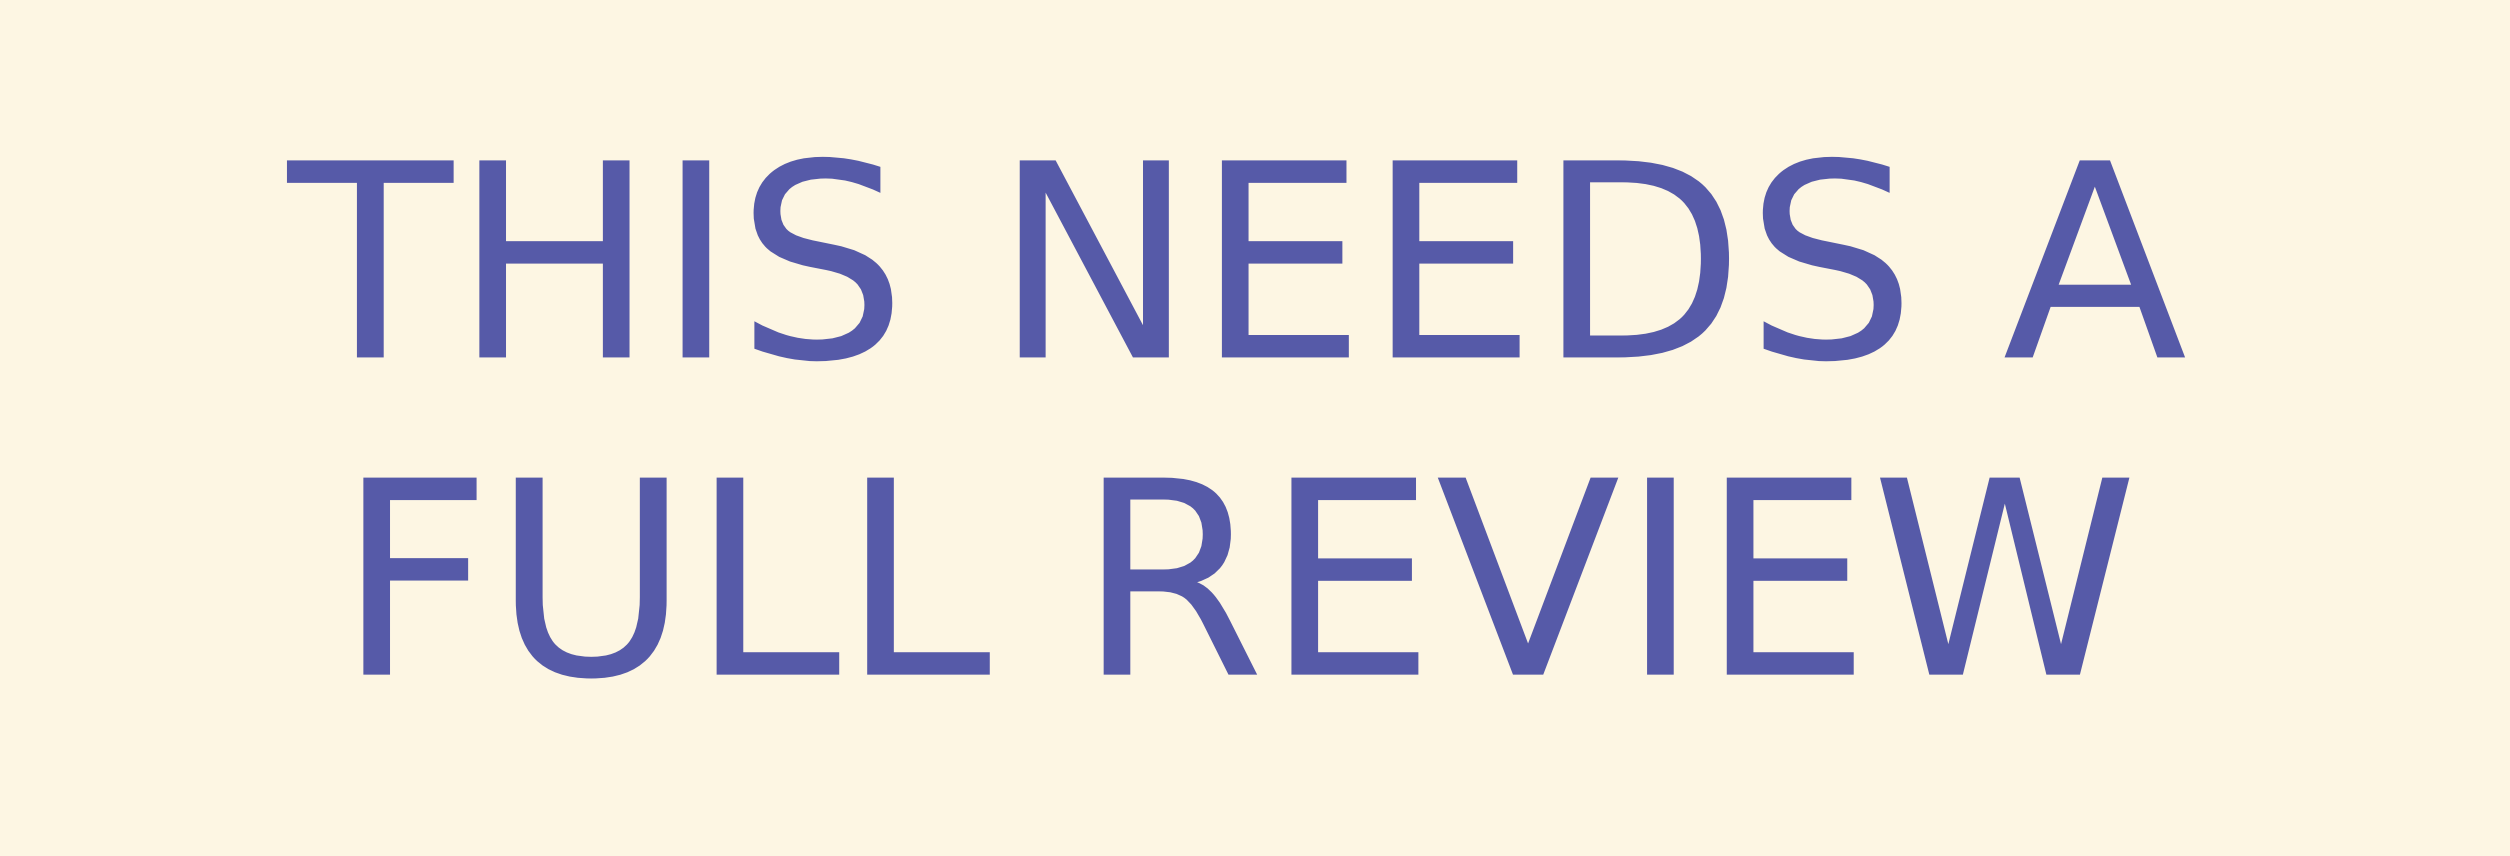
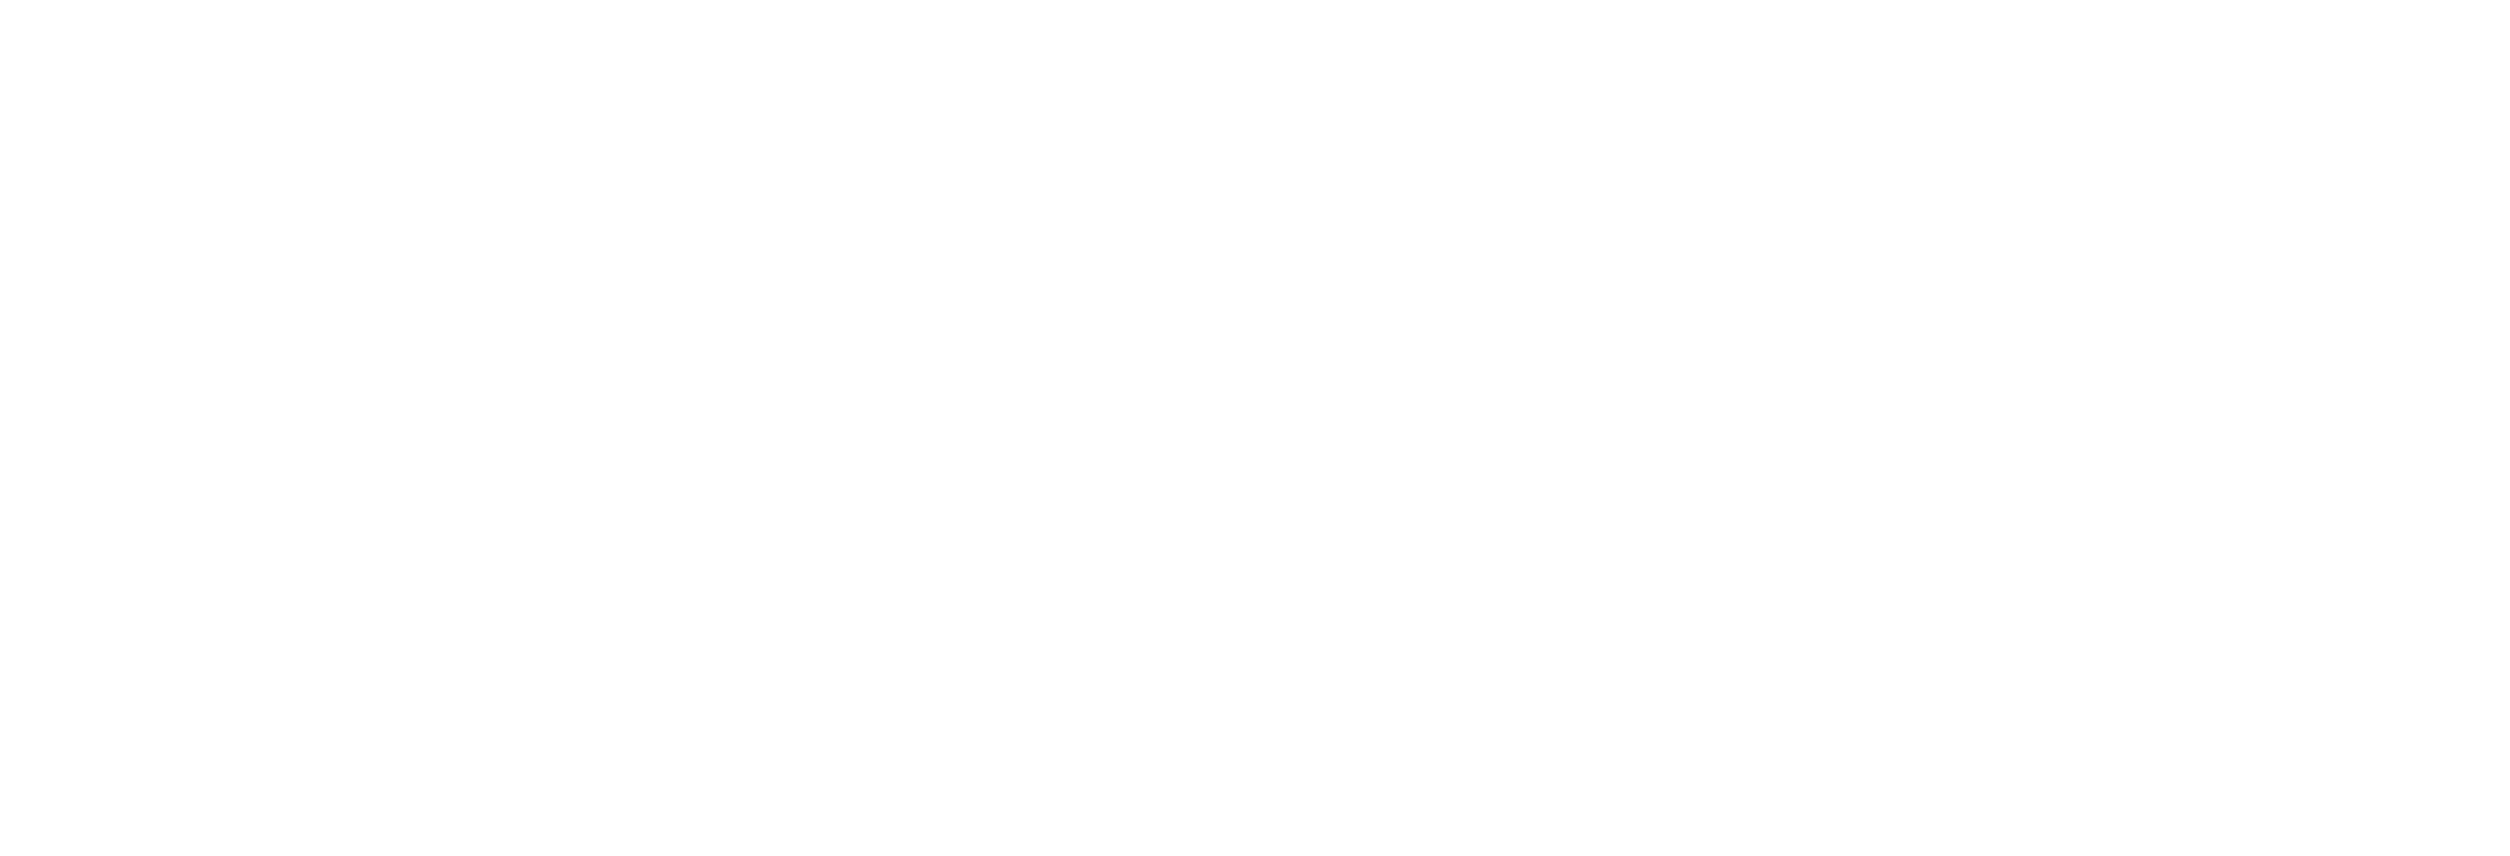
text: THIS NEEDS A (1236, 259) -> none
text: FULL REVIEW (1246, 578) -> none

